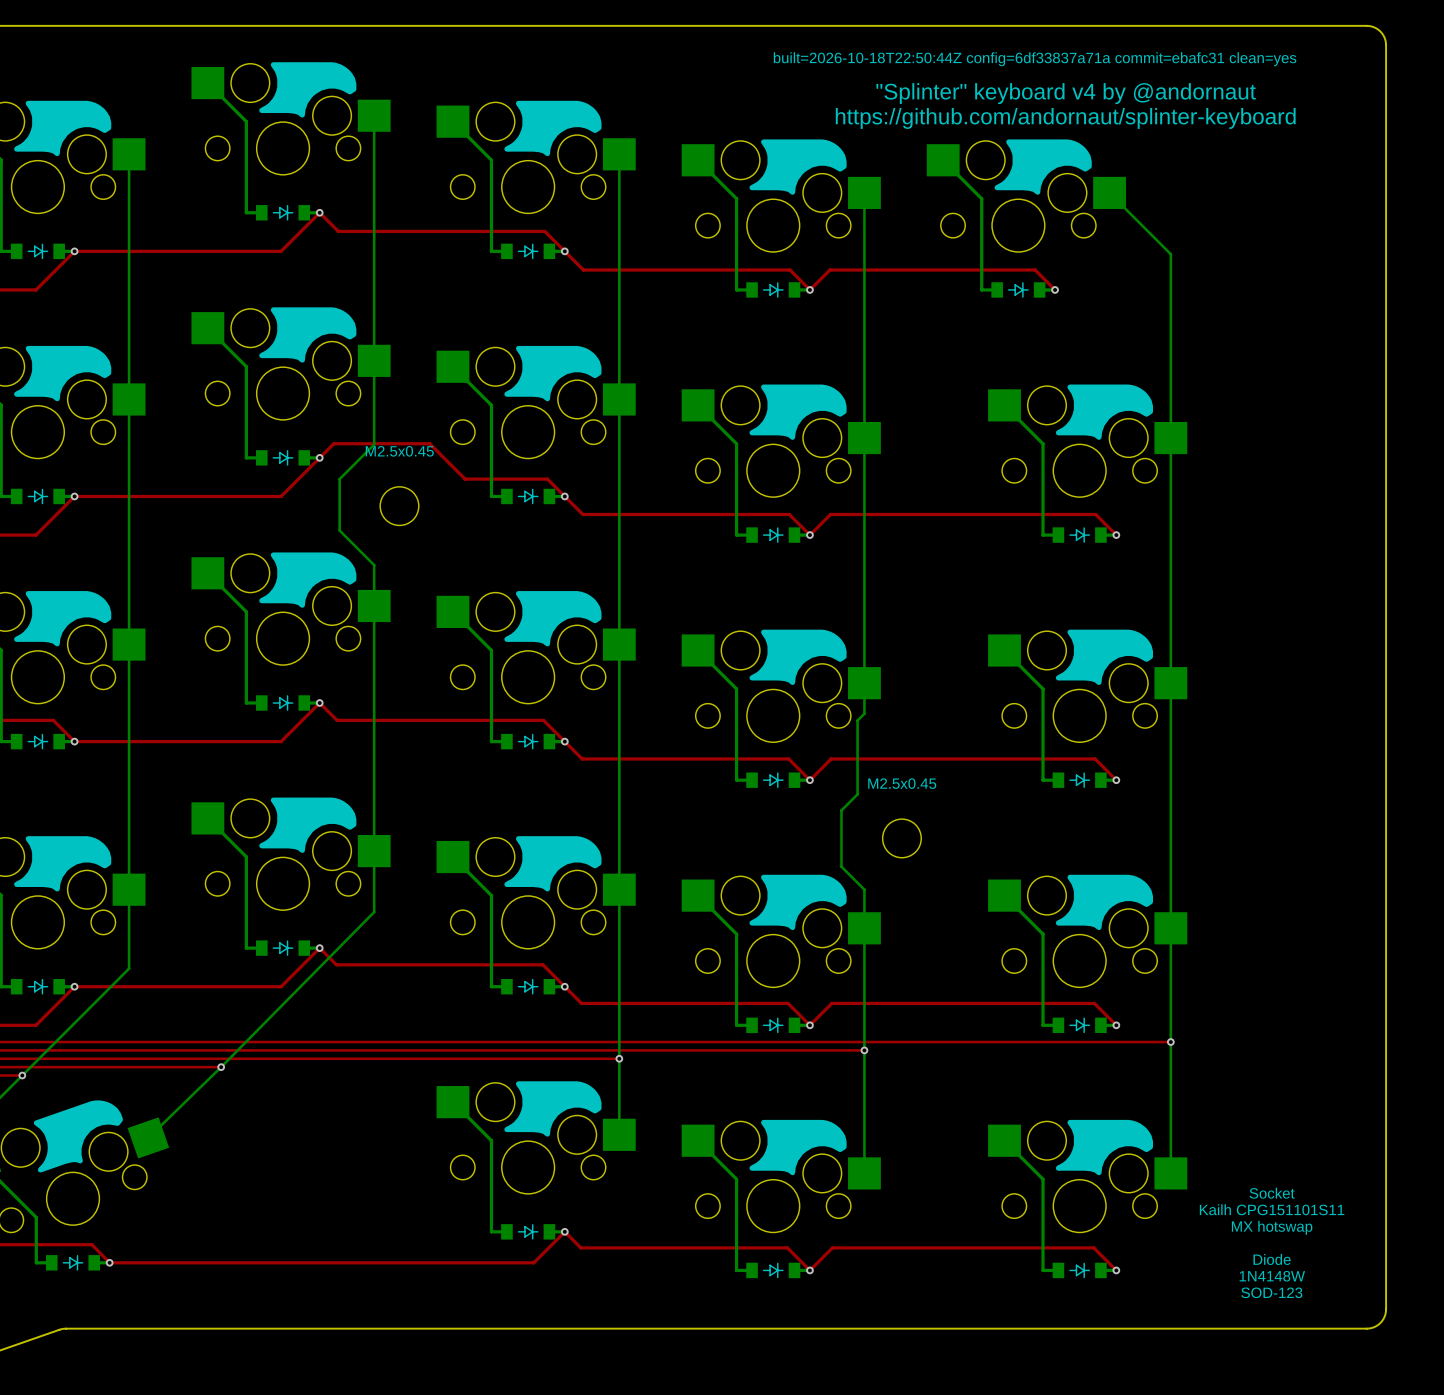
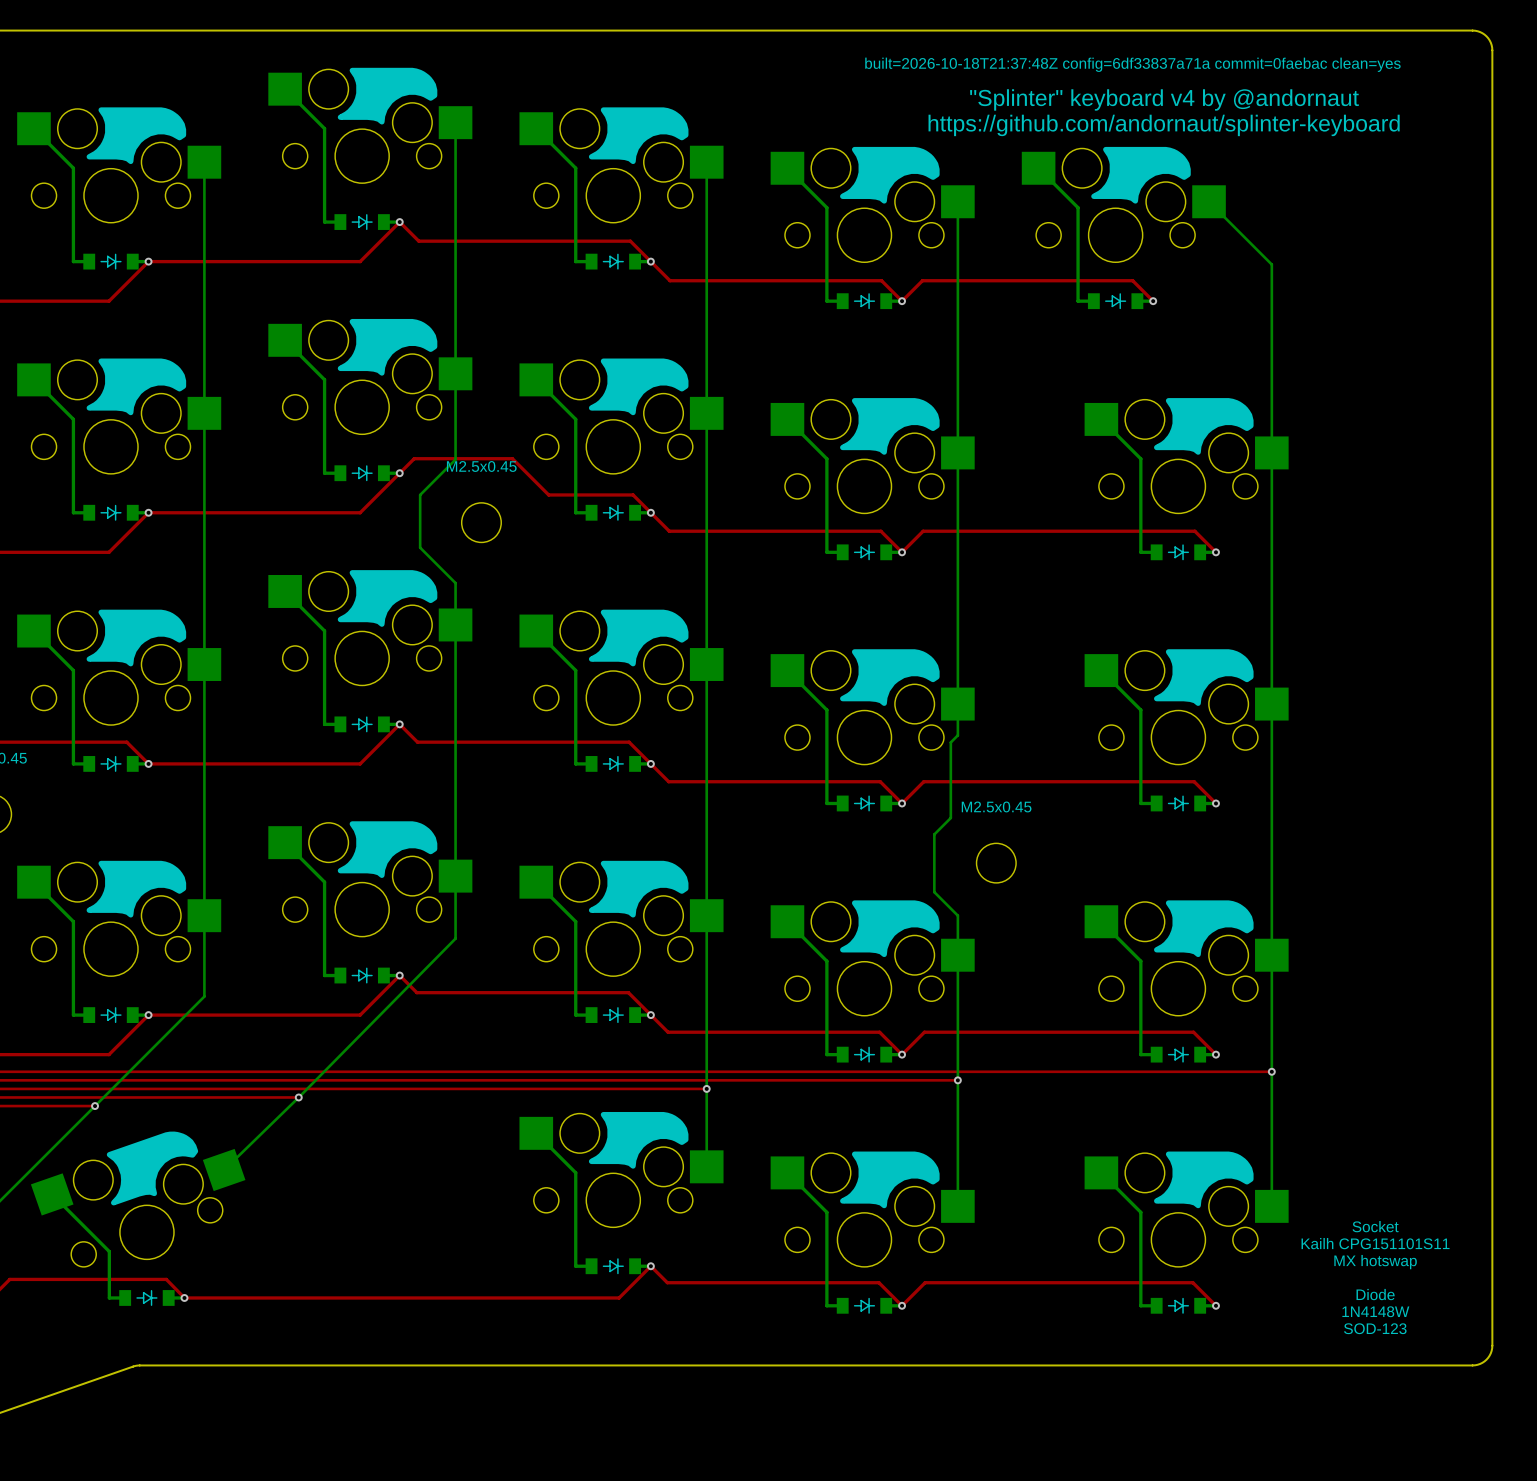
text: built=2026-10-18T22:50:44Z config=6df33837a71a commit=ebafc31 clean=yes (1035, 59) -> built=2026-10-18T21:37:48Z config=6df33837a71a commit=0faebac clean=yes (1132, 64)

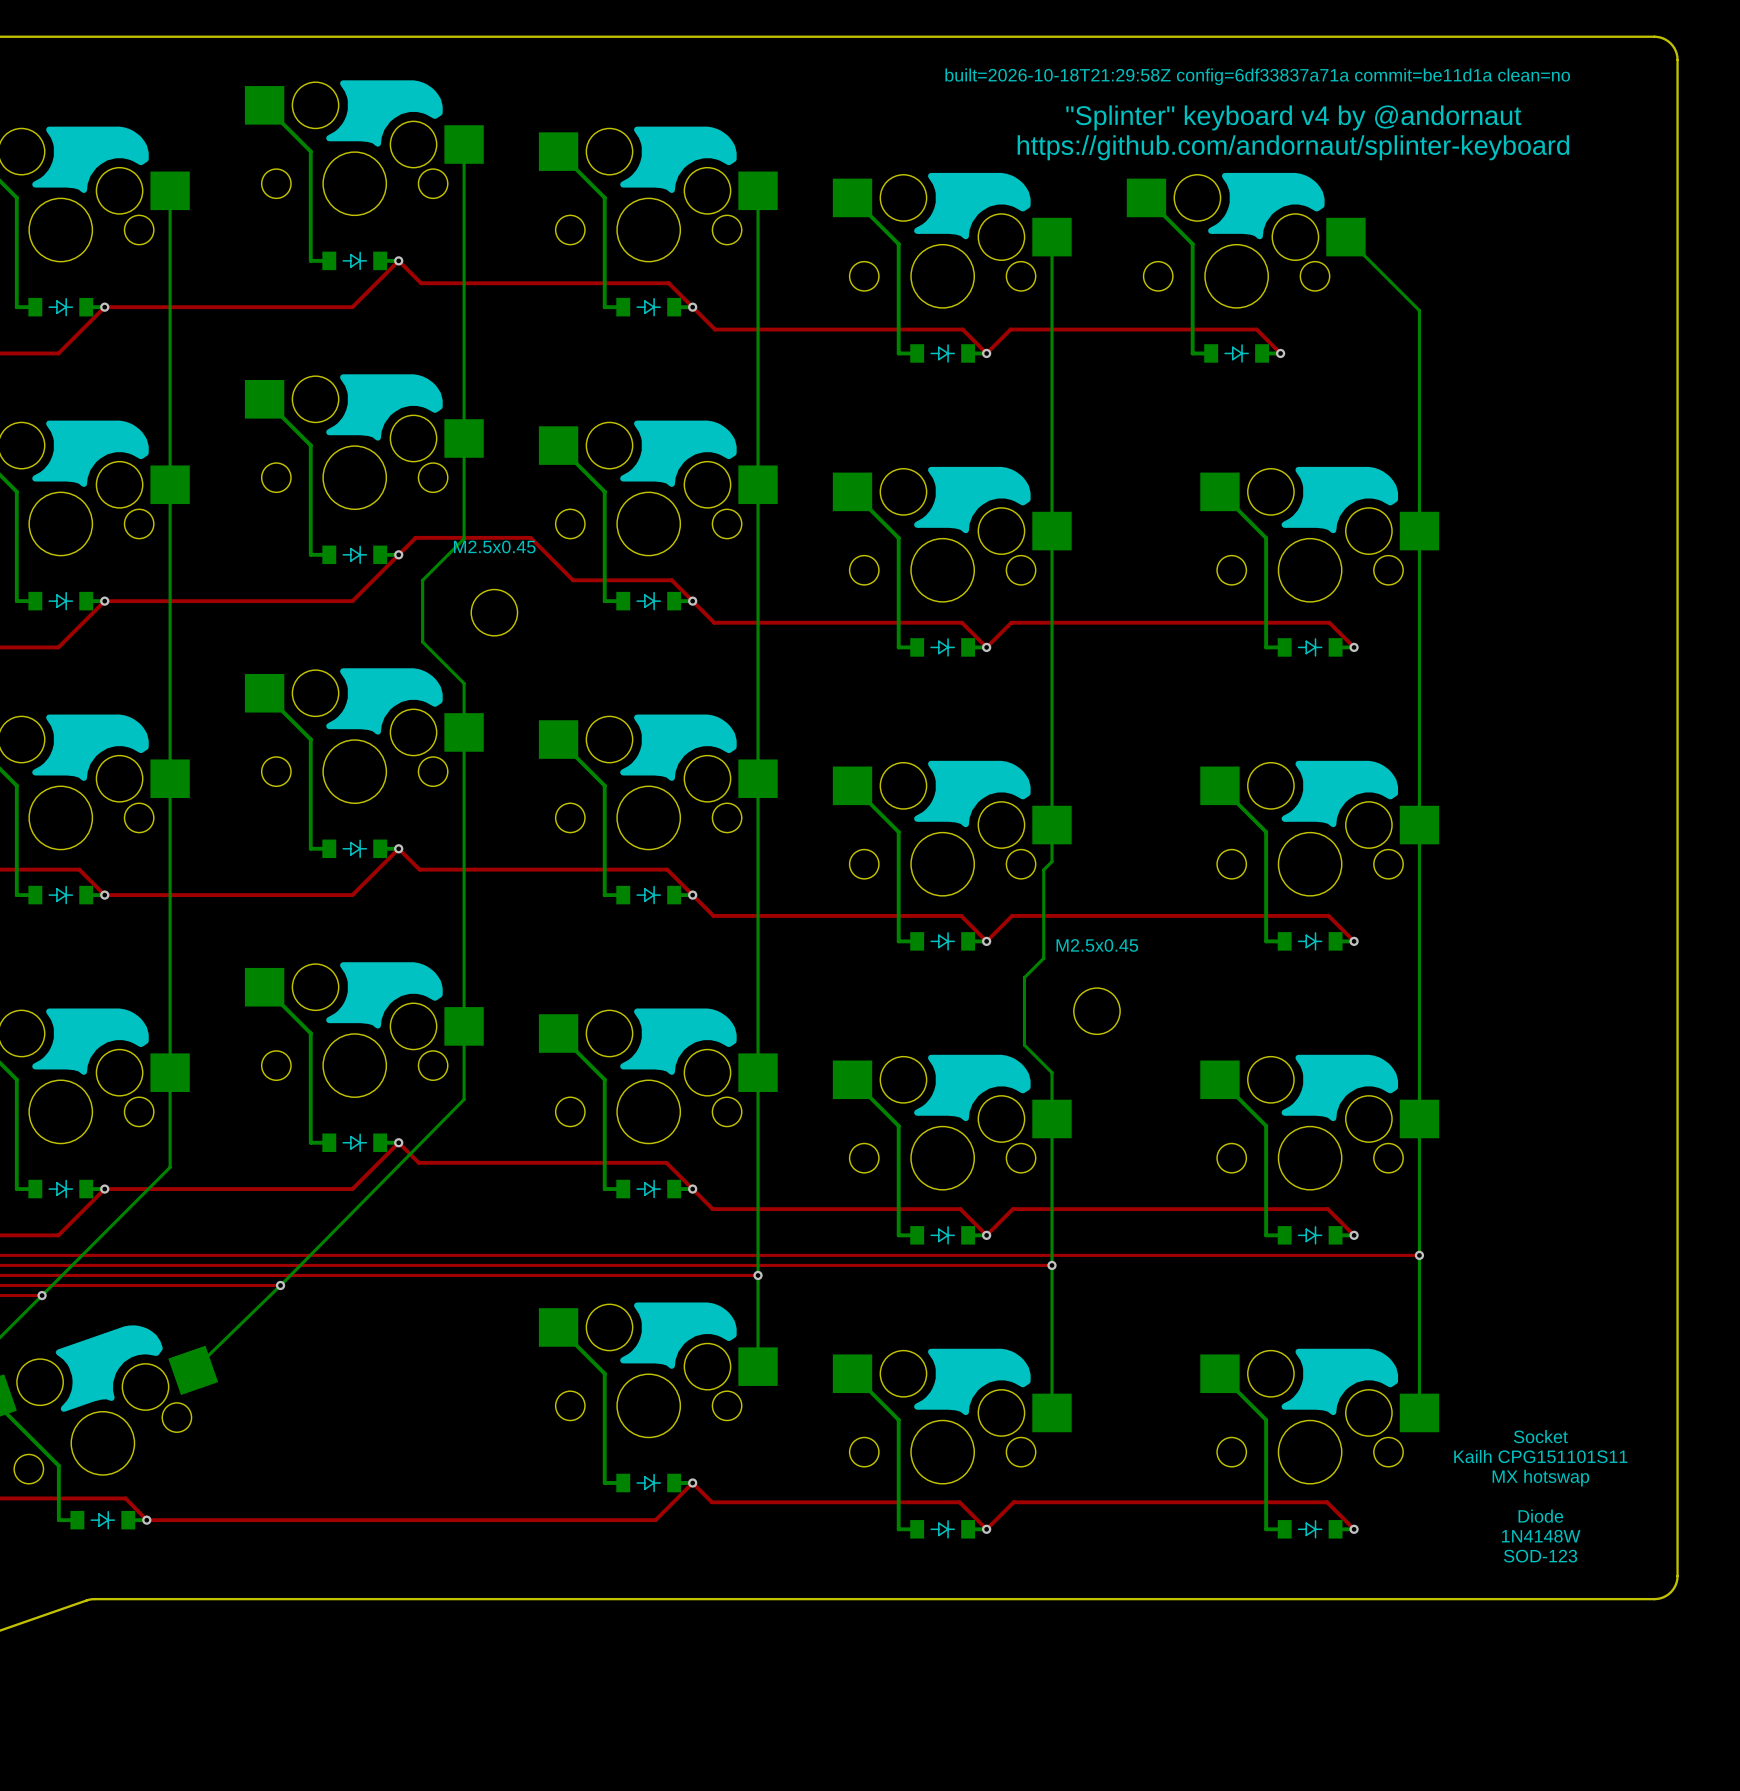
text: built=2026-10-18T21:37:48Z config=6df33837a71a commit=0faebac clean=yes (1132, 64) -> built=2026-10-18T21:29:58Z config=6df33837a71a commit=be11d1a clean=no (1257, 76)

